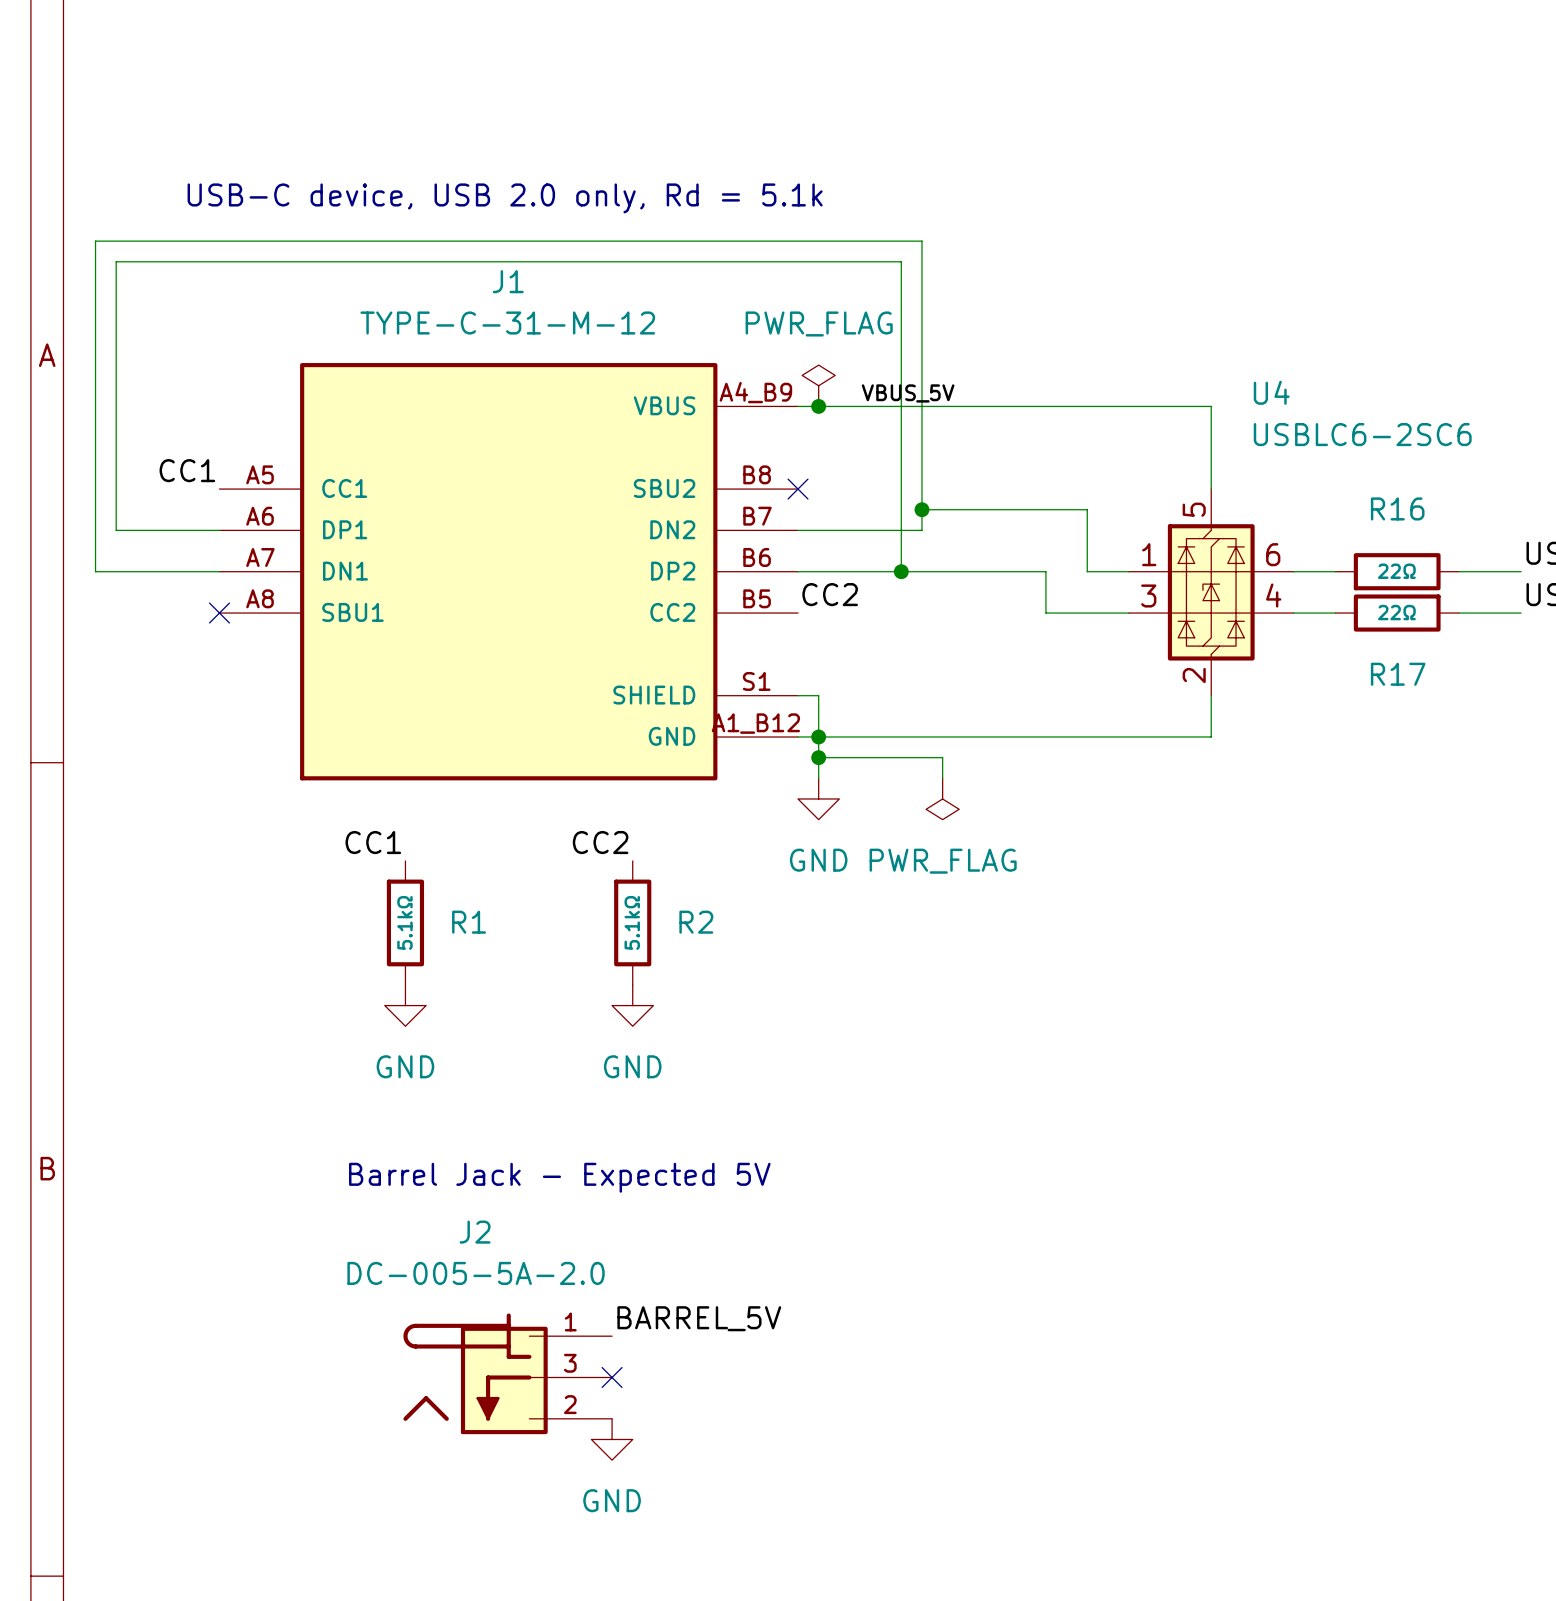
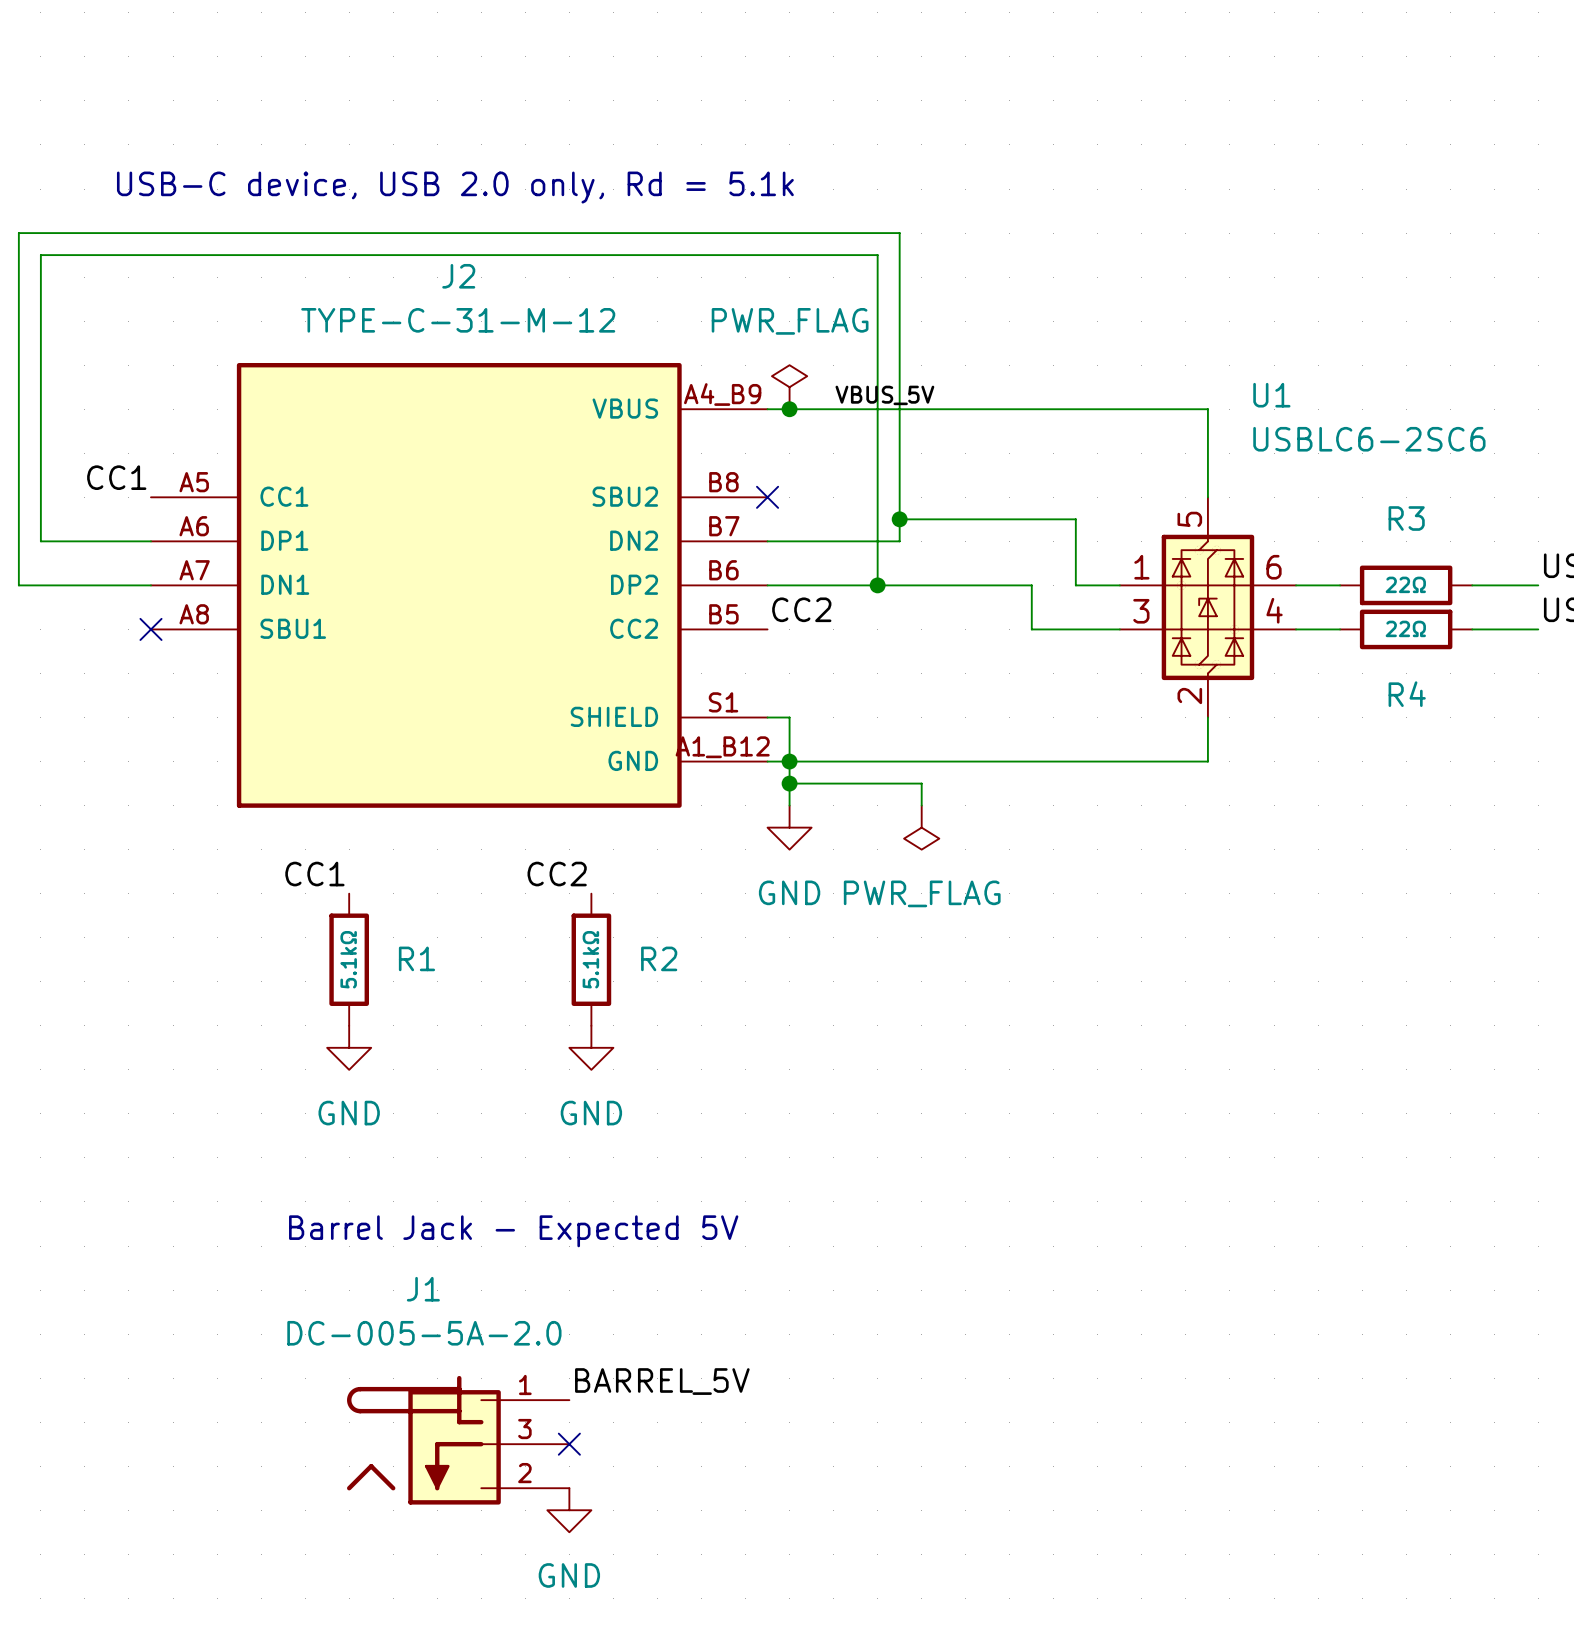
J1 name: J1 (508, 281) -> J2 (458, 276)
U4 name: U4 (1271, 392) -> U1 (1271, 395)
R16 name: R16 (1397, 508) -> R3 (1406, 518)
R17 name: R17 (1398, 674) -> R4 (1407, 694)
J2 name: J2 (475, 1232) -> J1 (423, 1289)

